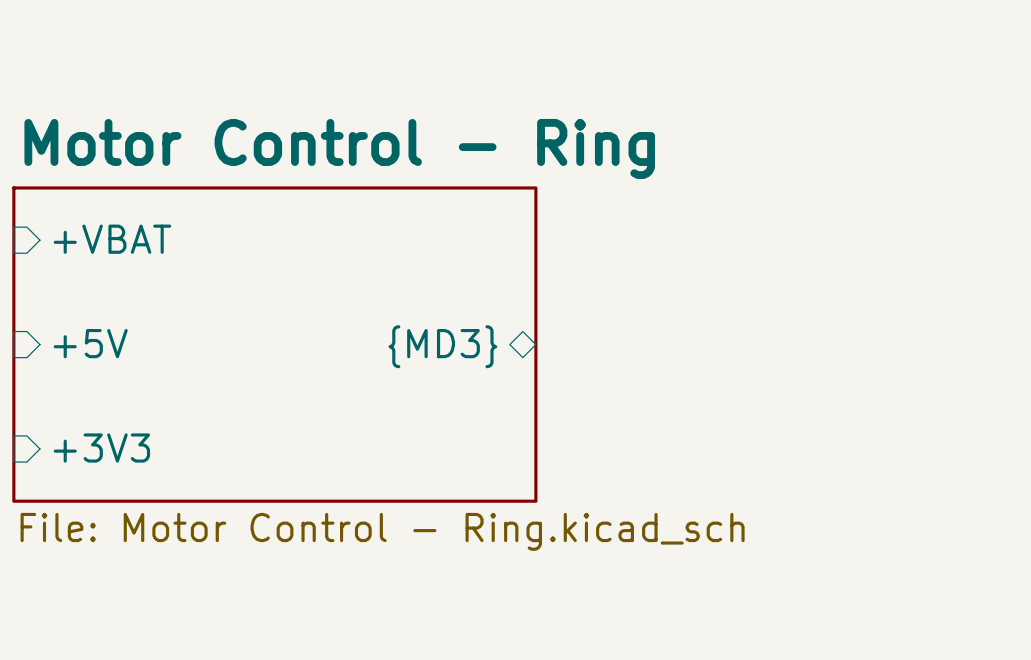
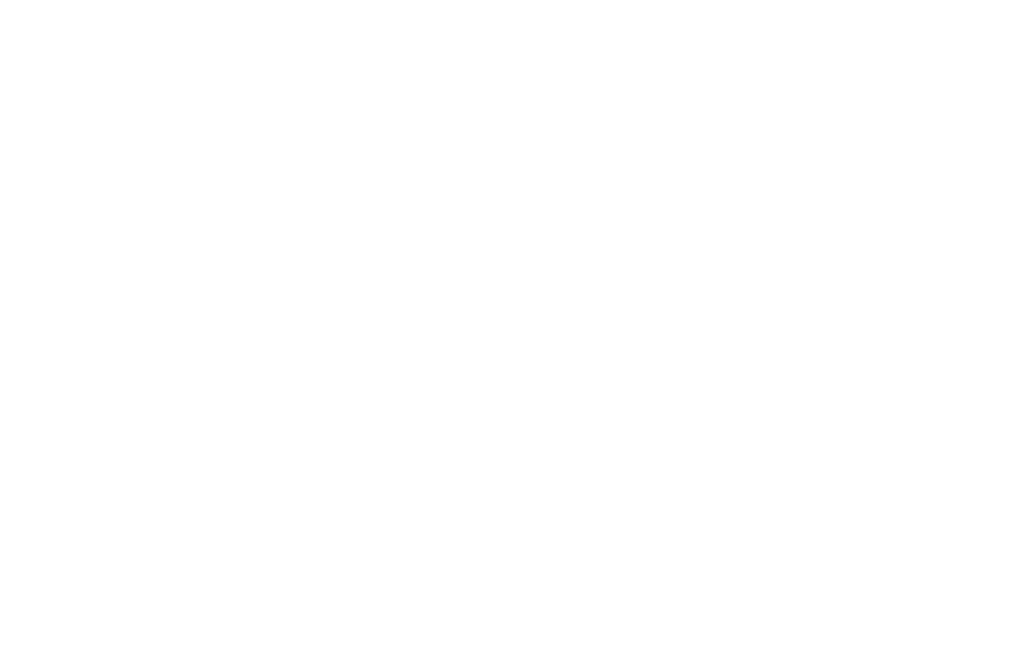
sheet pin: +VBAT (112, 239) -> none
sheet pin: +5V (90, 343) -> none
sheet Motor Control - Ring: File: Motor Control - Ring.kicad_sch (274, 344) -> none
sheet pin: {MD3} (442, 346) -> none
sheet pin: +3V3 (101, 448) -> none

